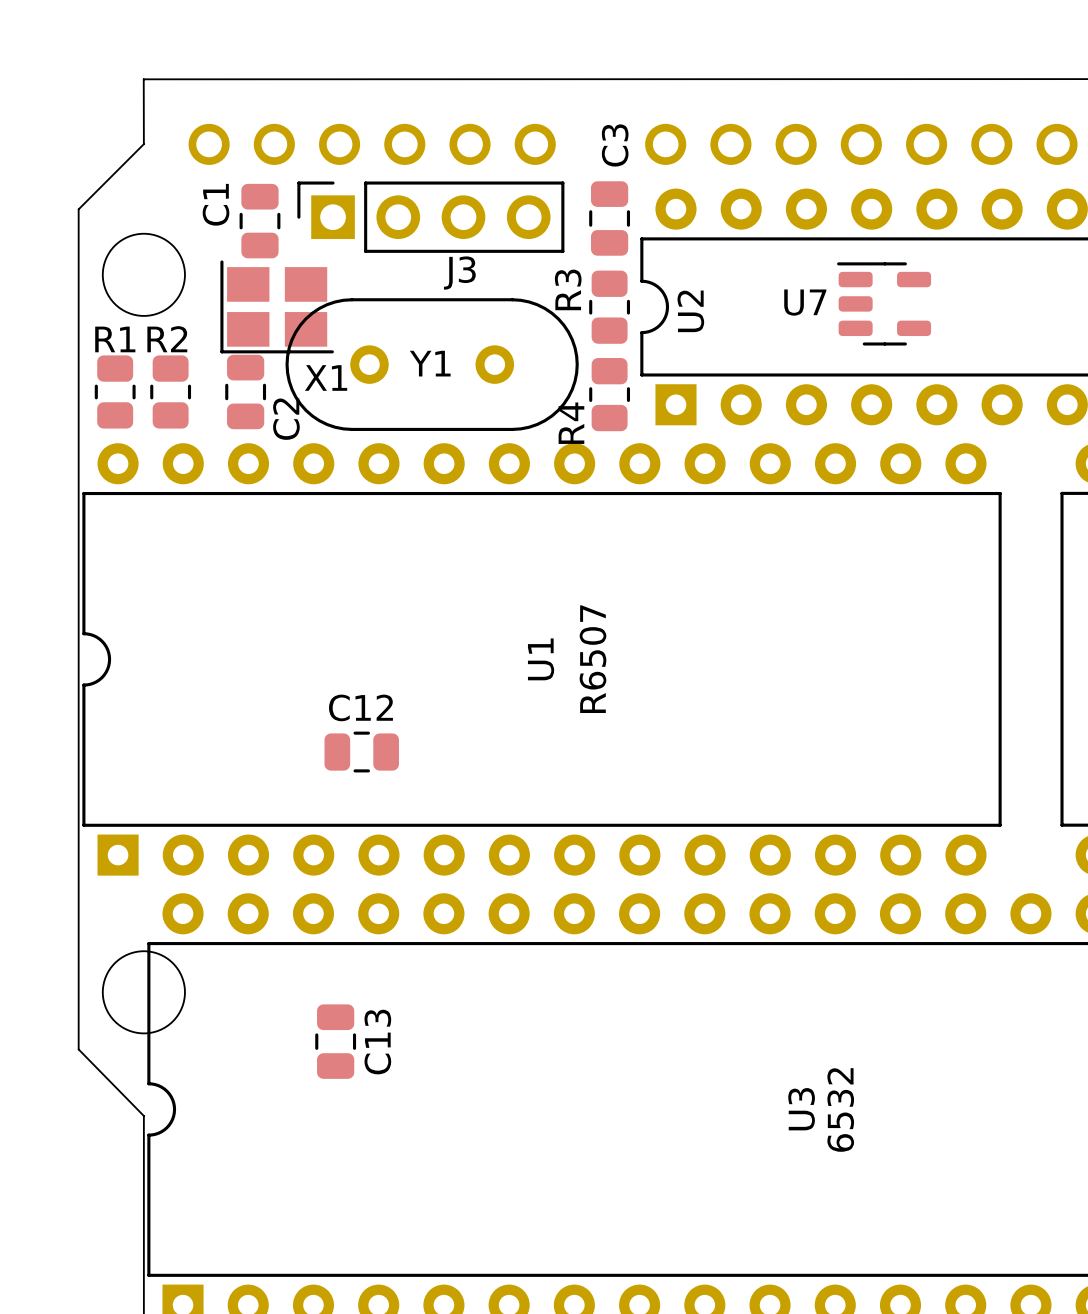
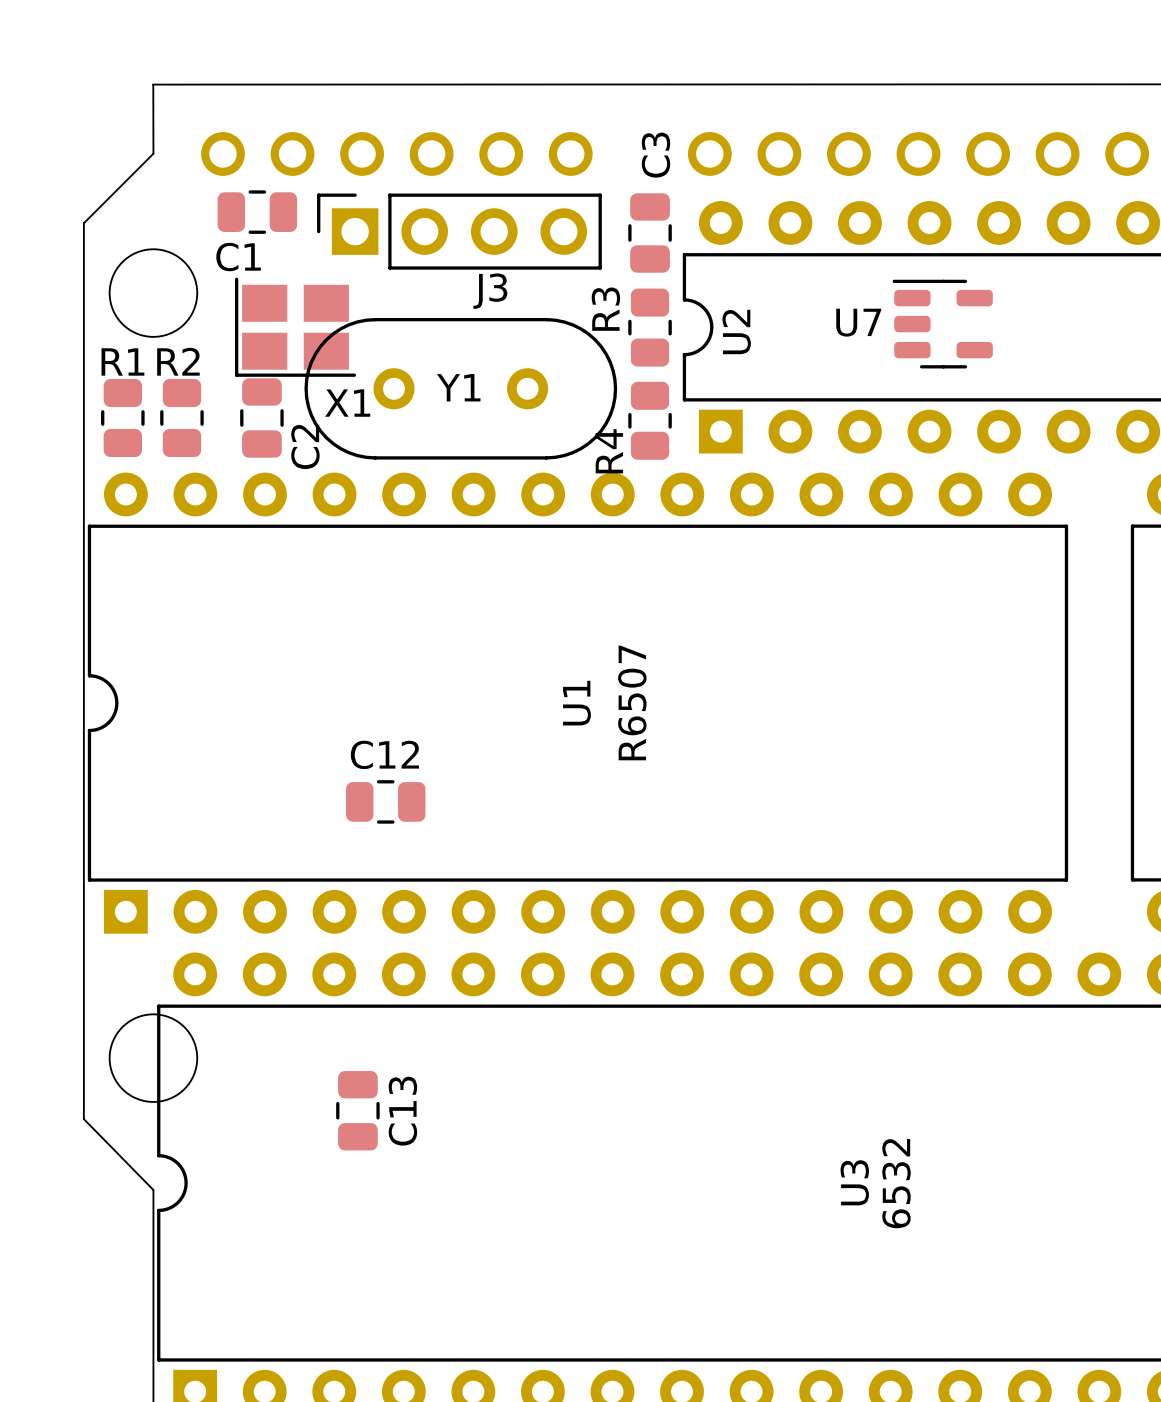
C1 name position: C1 (216, 204) -> C1 (238, 257)
C1 rotation: 0° (259, 221) -> 90° clockwise (257, 212)

